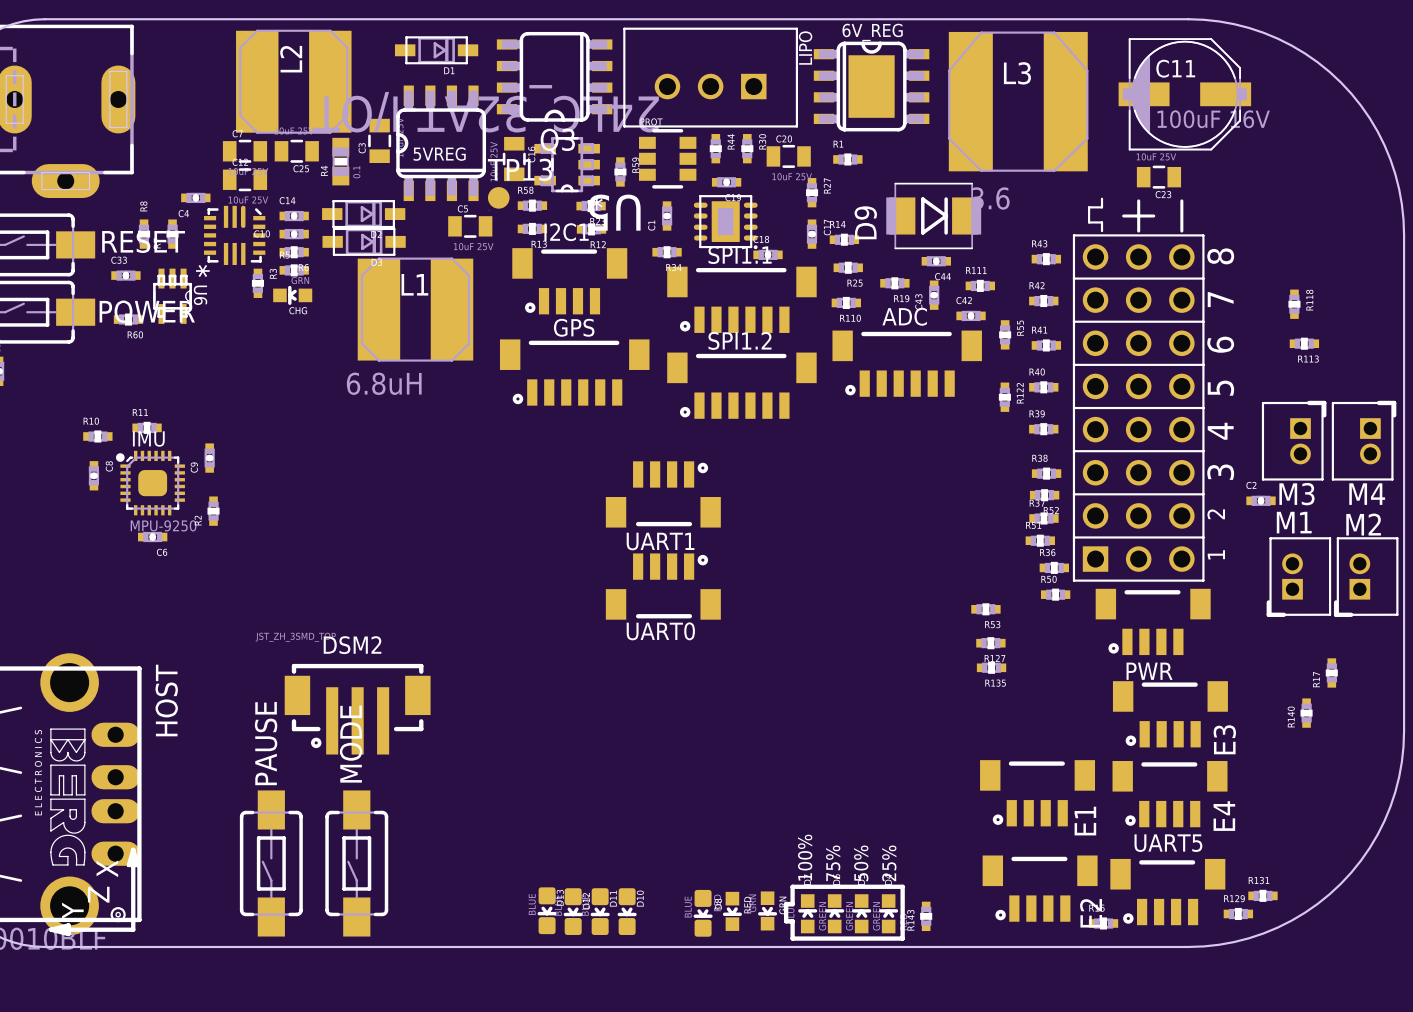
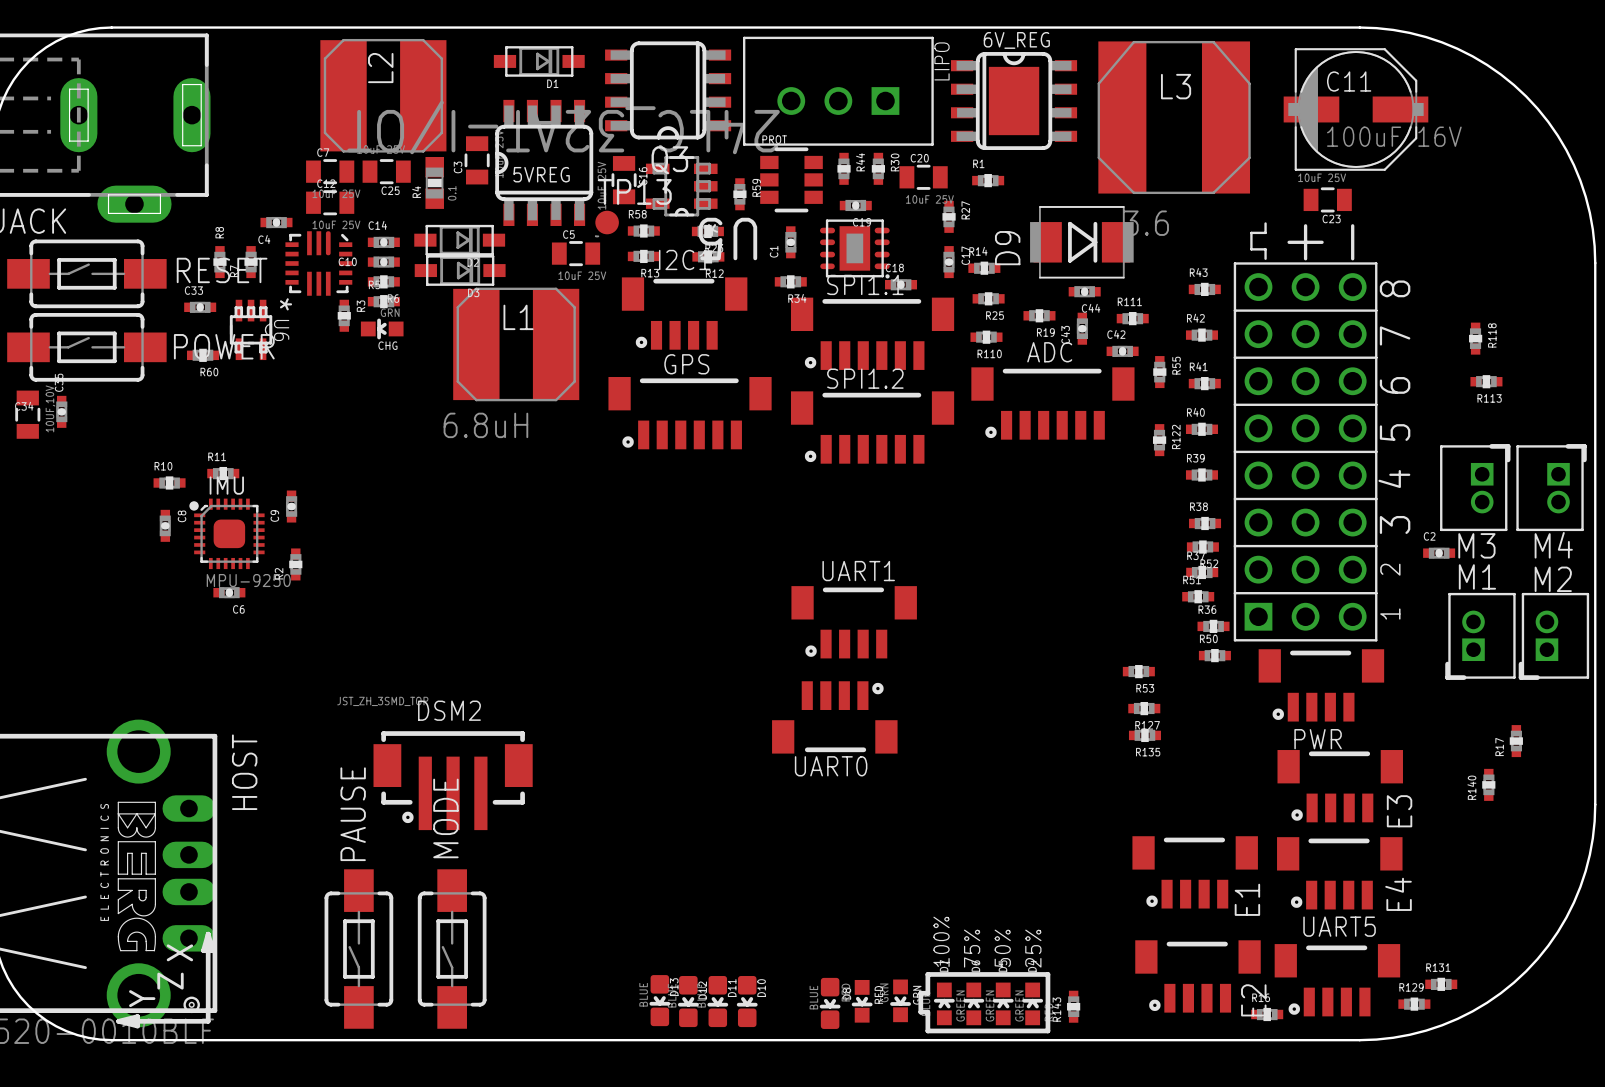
UART1 rotation: 0° (663, 494) -> 180° (854, 622)
UART1 position: (663, 494) -> (854, 622)
UART0 position: (663, 586) -> (834, 717)

